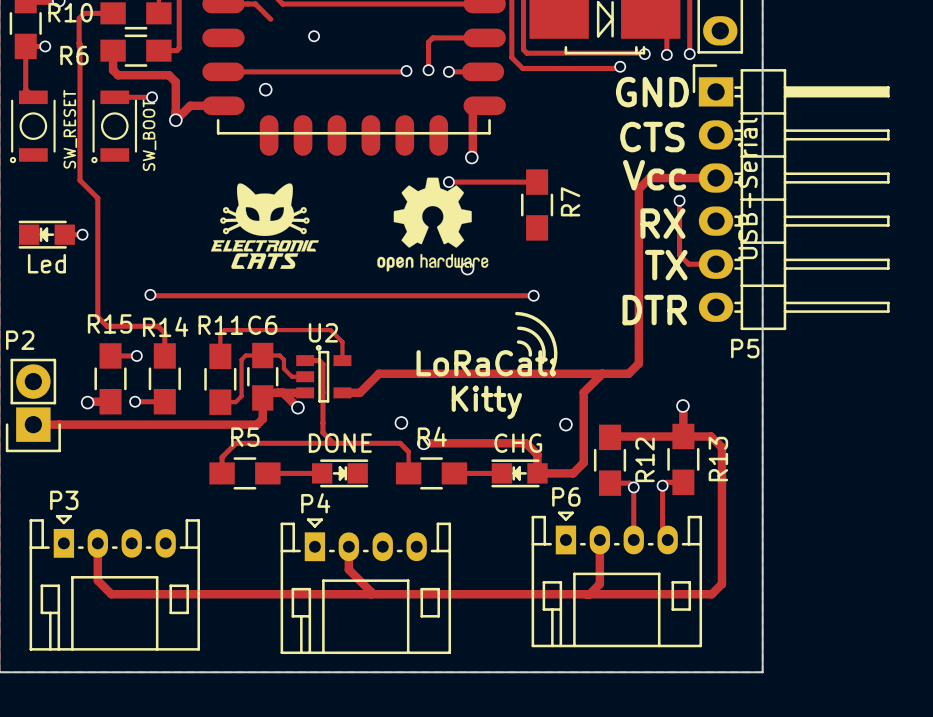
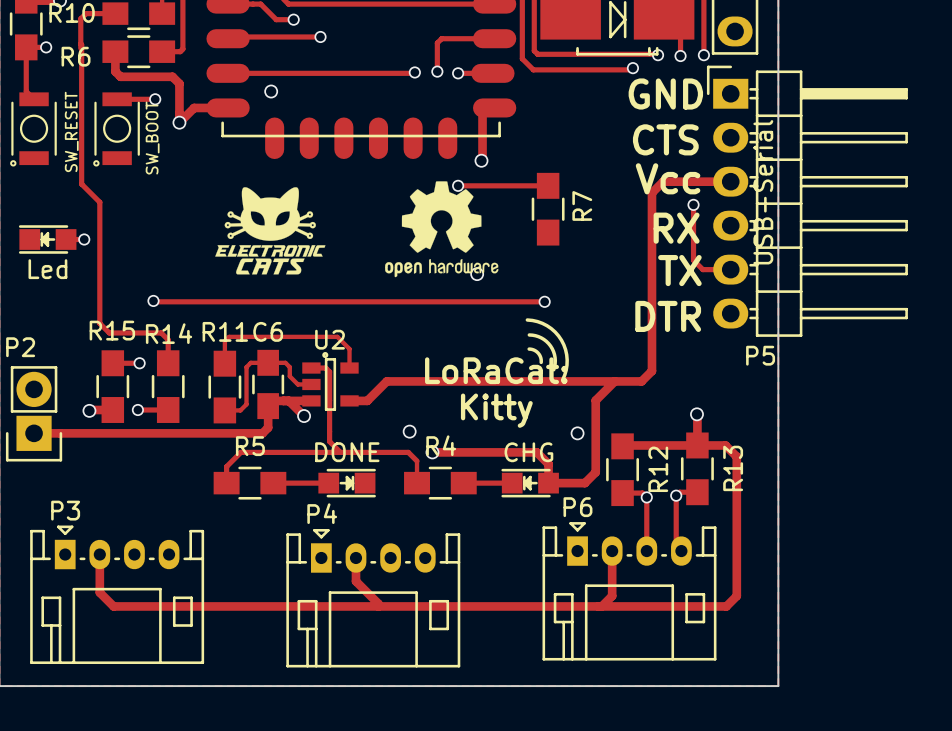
track: none -> (276, 19) (293, 19)
via: none -> (293, 19)
track: none -> (320, 36) (241, 37)

